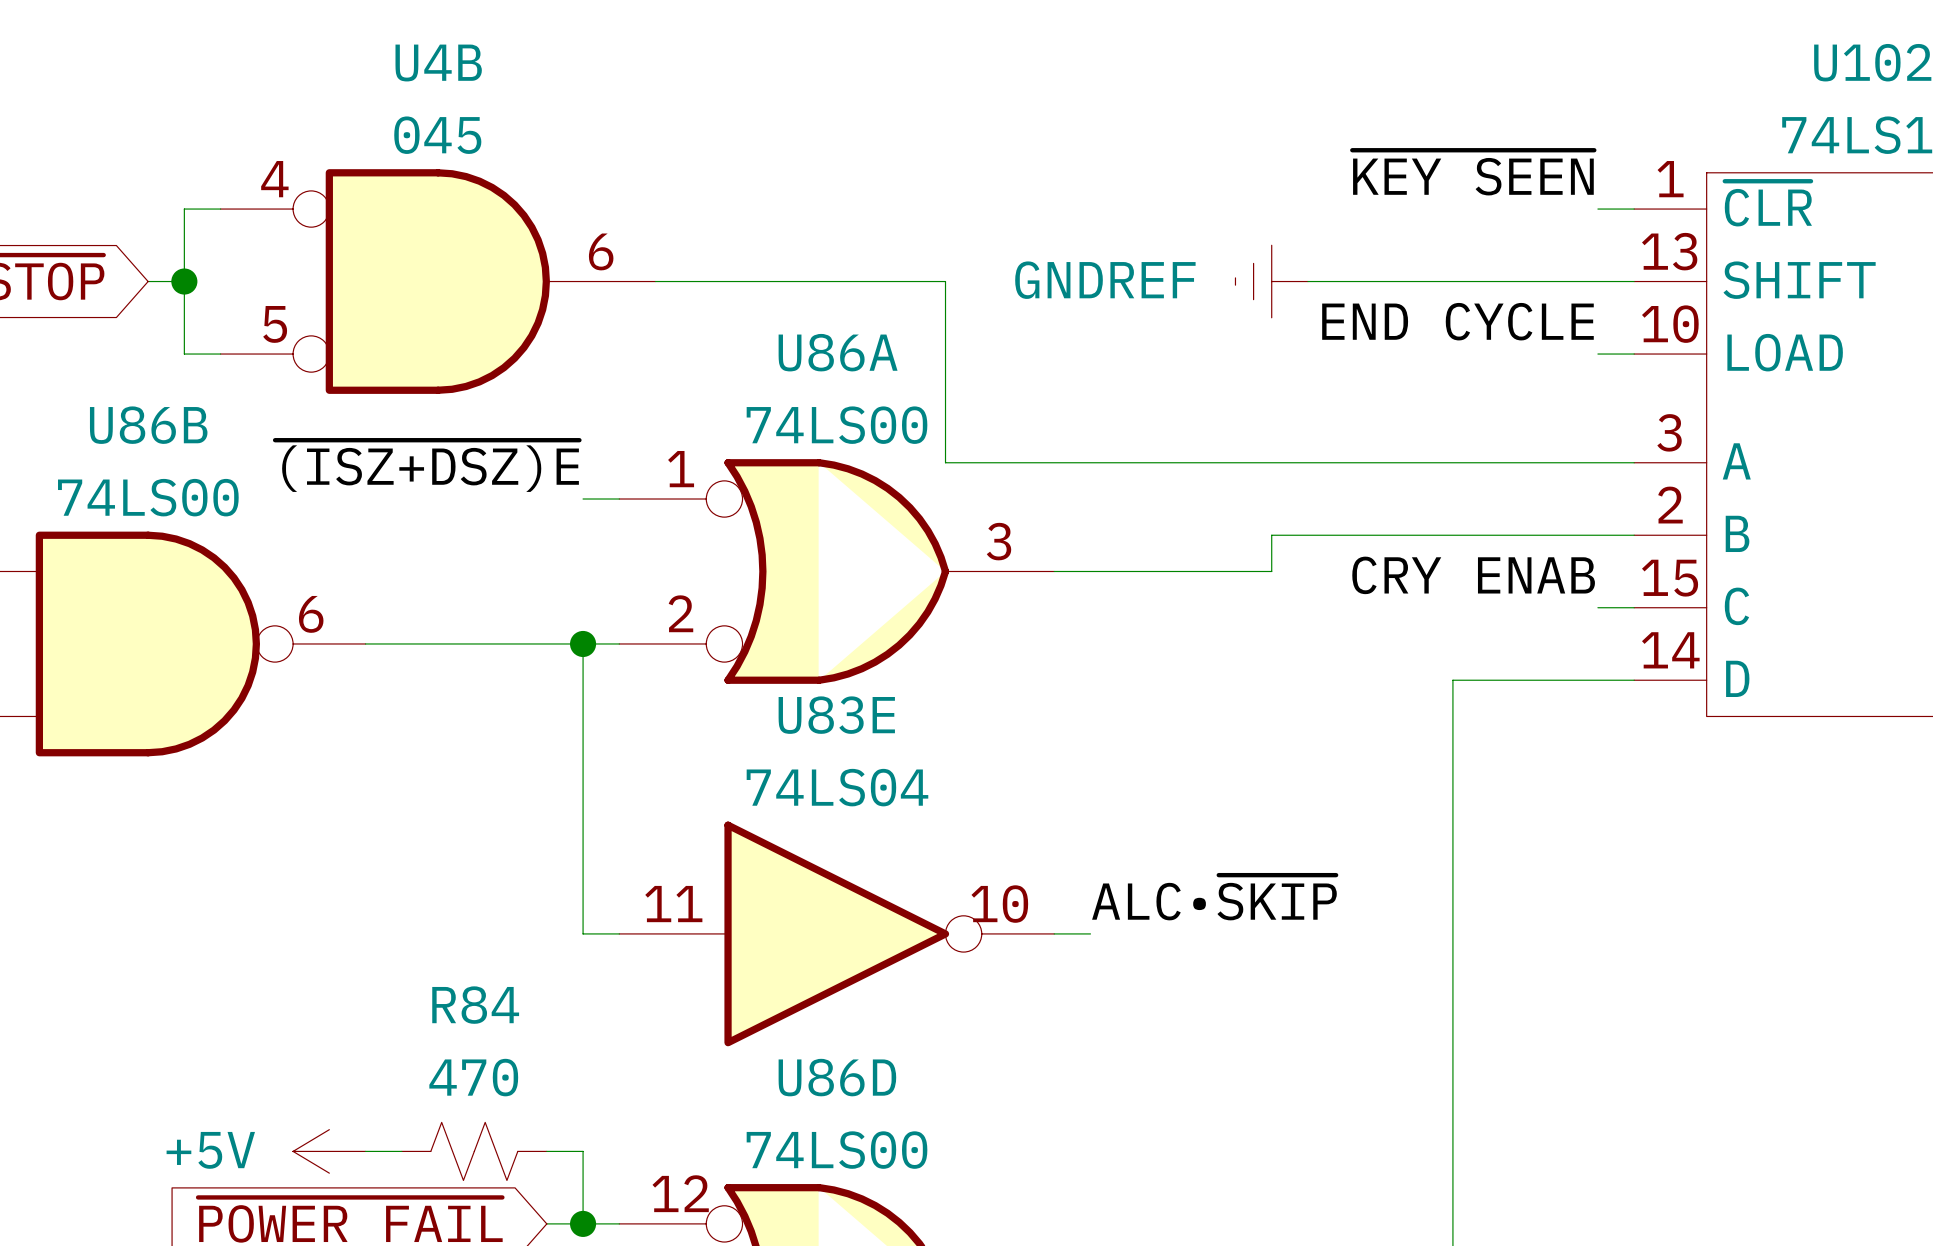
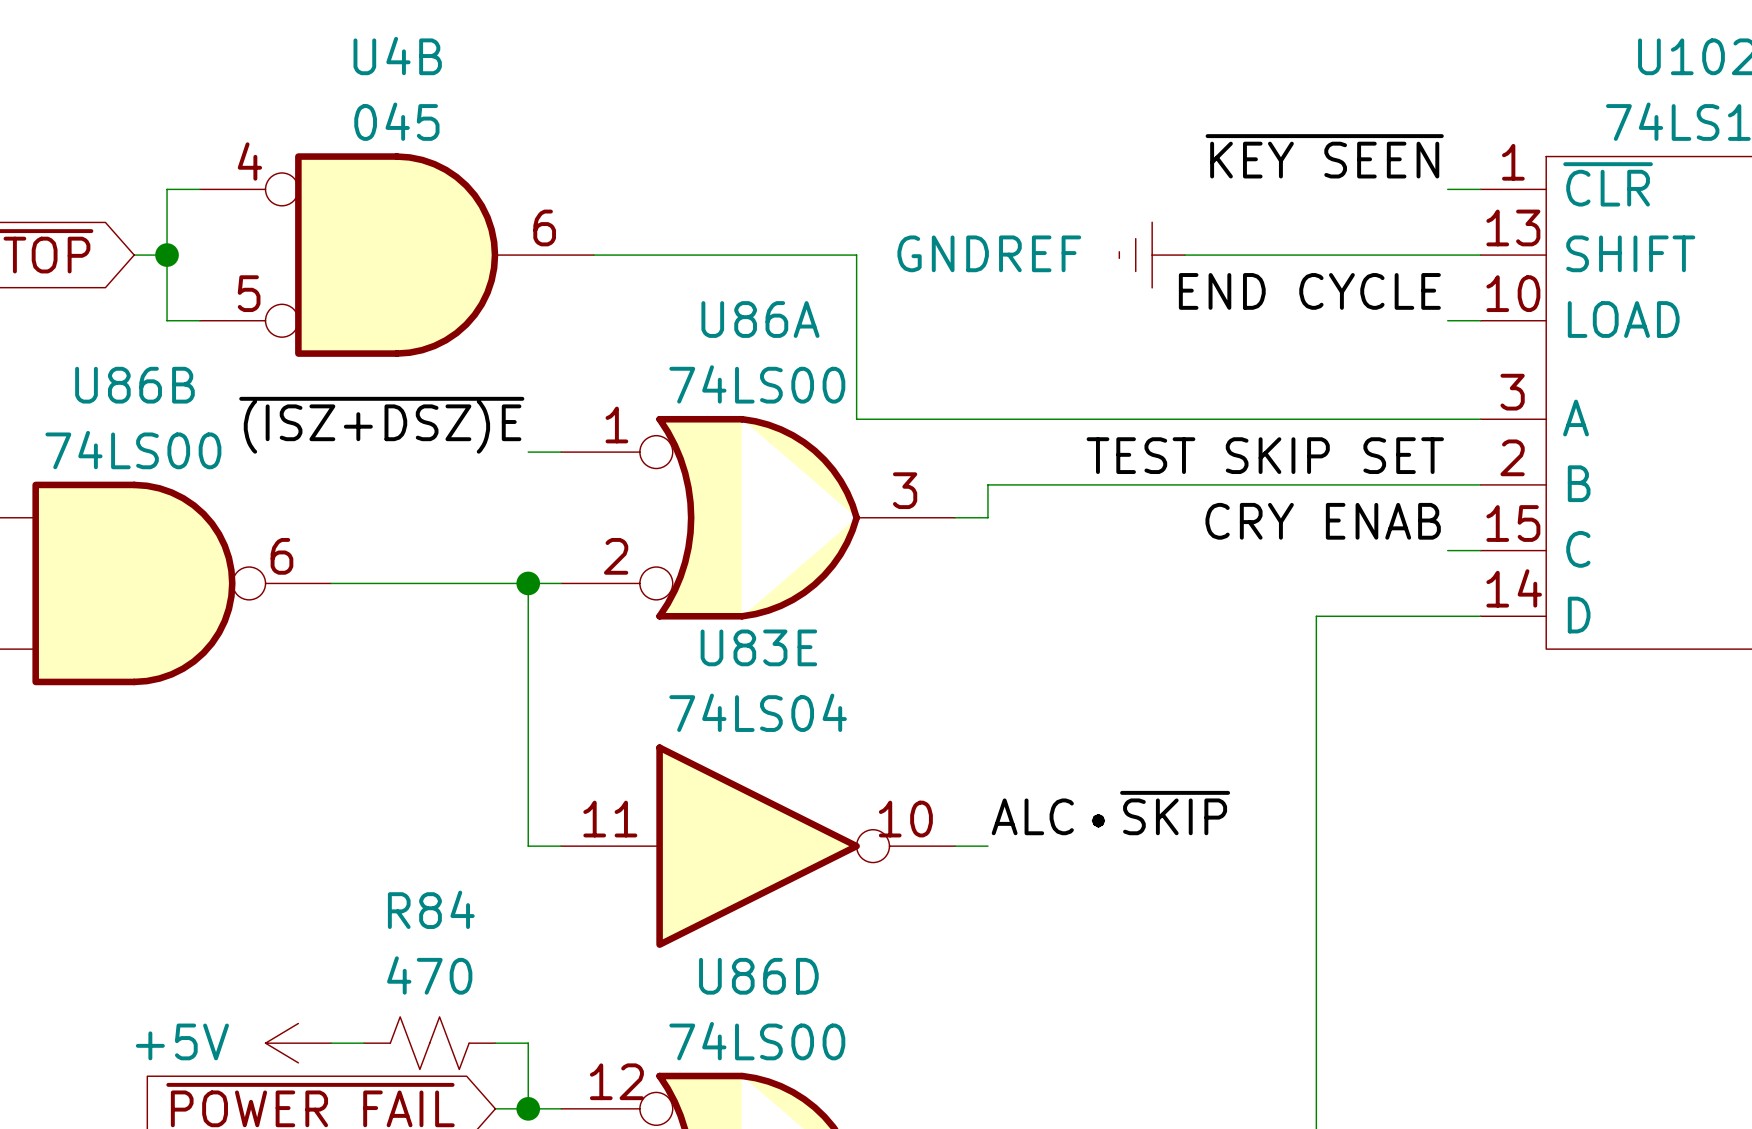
label: none -> TEST SKIP SET (1265, 455)
wire: (1271, 535) (1271, 571) (1090, 571) -> (1152, 484) (987, 484) (987, 517)

